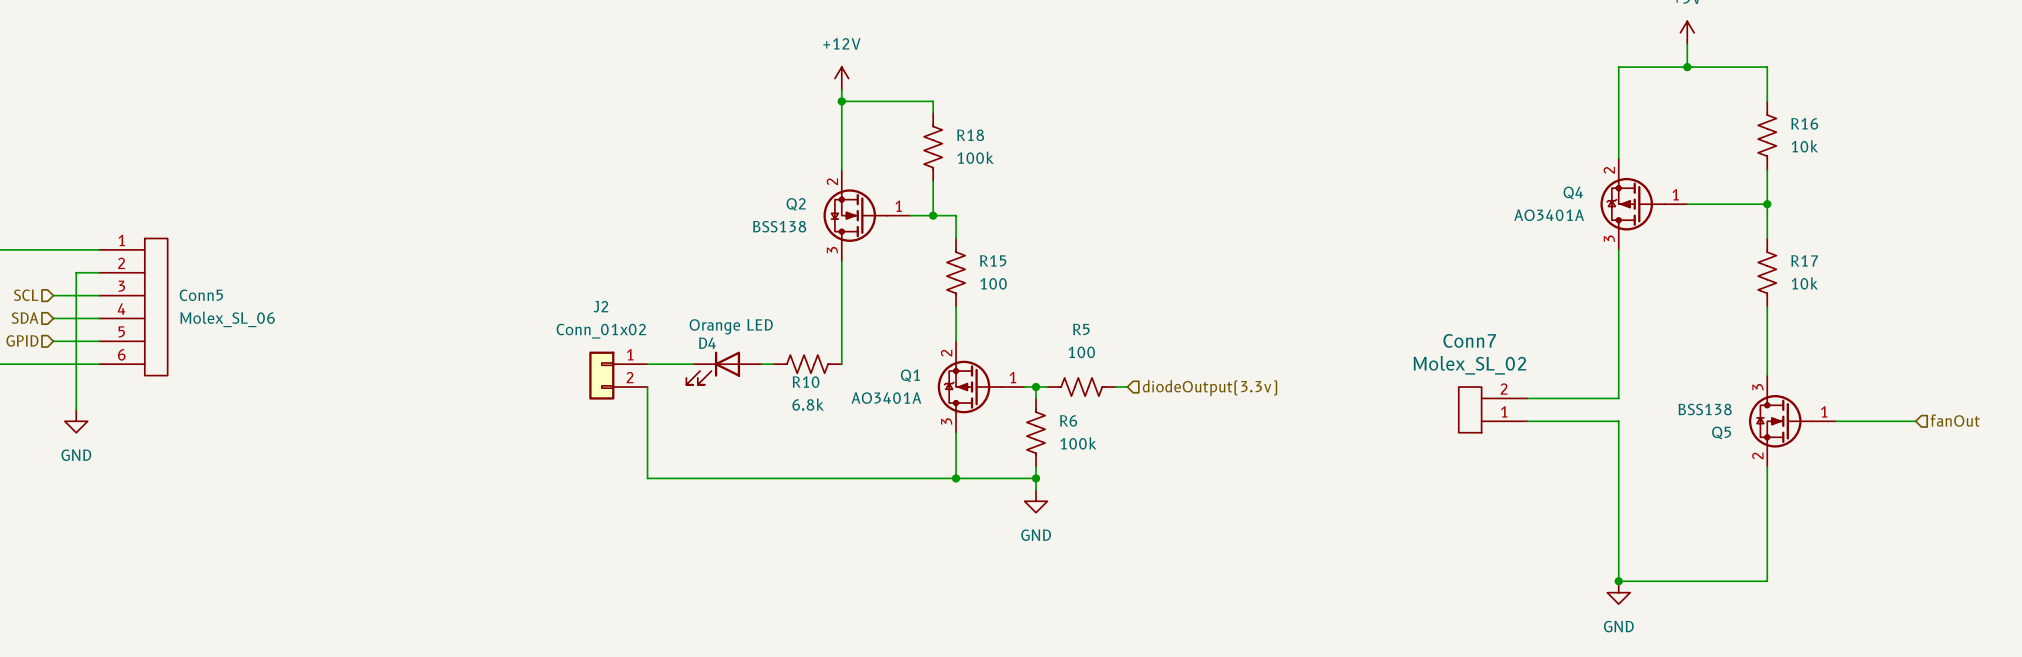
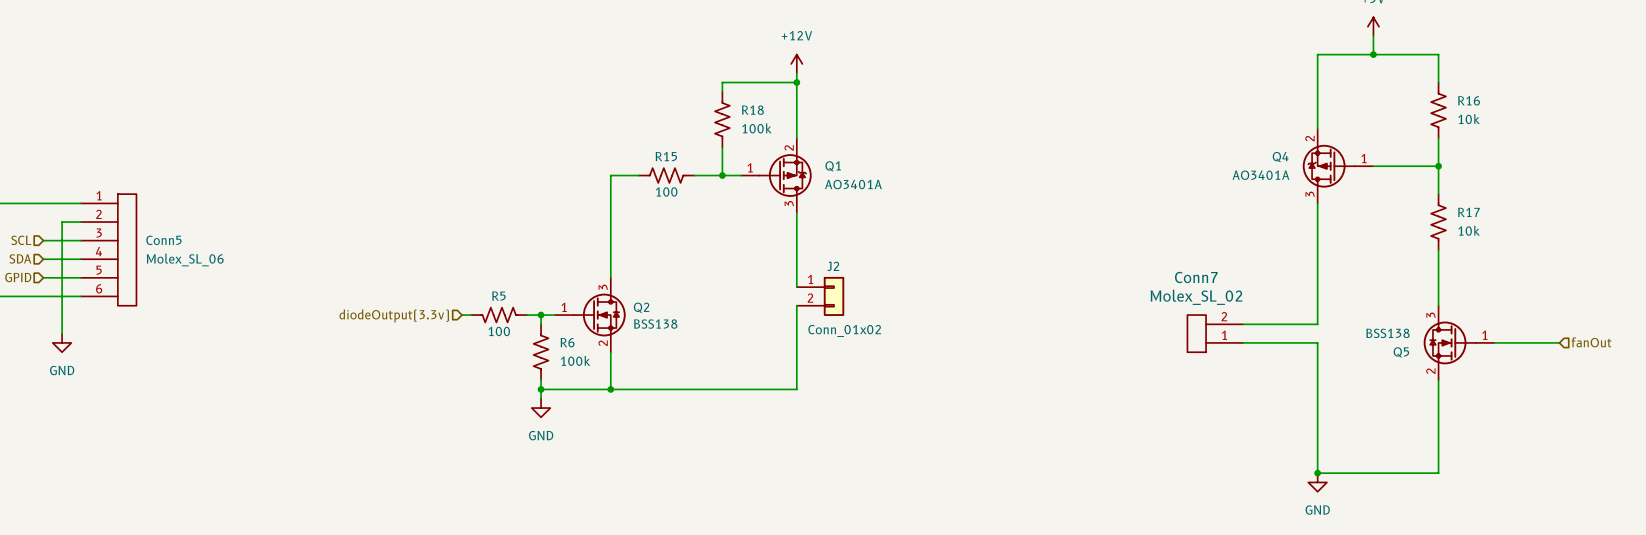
power symbol position: +12V (841, 78) -> +12V (796, 63)
wire: (841, 89) (841, 169) -> (796, 73) (796, 138)
wire: (841, 101) (887, 101) -> (722, 91) (722, 82)
junction: (841, 101) -> none
wire: (933, 101) (933, 112) -> (759, 82) (796, 82)
junction: none -> (796, 82)
R18 position: (933, 147) -> (722, 119)
wire: (933, 181) (933, 215) -> (722, 147) (722, 175)
Q2 name position: Q2 (796, 204) -> Q2 (641, 307)
wire: none -> (638, 175) (610, 175) (610, 277)
Q2 rotation: 0° (855, 215) -> 180° (599, 315)
Q2 position: (866, 215) -> (590, 315)
junction position: (933, 215) -> (722, 175)
Q2 value position: BSS138 (779, 226) -> BSS138 (655, 324)
R15 name position: R15 (993, 260) -> R15 (666, 156)
wire: (841, 261) (841, 364) -> none
wire: none -> (796, 212) (796, 287)
R15 rotation: 0° (956, 272) -> 90° clockwise (666, 175)
R15 position: (956, 272) -> (666, 175)
R15 value position: 100 (993, 283) -> 100 (666, 191)
J2 name position: J2 (600, 306) -> J2 (833, 266)
wire: (956, 307) (956, 341) -> none
R5 name position: R5 (1081, 329) -> R5 (498, 296)
J2 value position: Conn_01x02 (601, 331) -> Conn_01x02 (844, 330)
R5 value position: 100 (1081, 352) -> 100 (499, 331)
wire: (647, 364) (693, 364) -> none
wire: (761, 364) (773, 364) -> (461, 315) (471, 315)
R10: 6.8k (807, 364) -> none
D4: Orange LED (724, 368) -> none
J2 flip: as is (601, 375) -> left-right (834, 296)
J2 position: (618, 375) -> (820, 296)
wire: (647, 387) (647, 478) (664, 478) -> (527, 315) (554, 315)
wire: none -> (541, 315) (541, 324)
junction: none -> (541, 315)
Q1 flip: as is (969, 387) -> left-right (785, 175)
Q1 position: (981, 387) -> (776, 175)
wire: (1036, 387) (1036, 398) -> none
junction: (1036, 387) -> none
R5 flip: as is (1081, 387) -> left-right (499, 315)
R5 position: (1081, 387) -> (499, 315)
wire: (1115, 387) (1127, 387) -> none
hierarchical label: none -> diodeOutput(3.3v) (394, 315)
hierarchical label: diodeOutput(3.3v) (1210, 388) -> none
wire: (956, 432) (956, 478) -> (610, 352) (610, 389)
R6 position: (1036, 432) -> (541, 352)
wire: none -> (541, 380) (541, 398)
wire: (1036, 467) (1036, 489) -> none
junction: none -> (541, 389)
junction: none -> (610, 389)
junction: (956, 478) -> none
wire: (978, 478) (1036, 478) -> (796, 389) (796, 305)
junction: (1036, 478) -> none
power symbol: none -> GND (541, 408)
power symbol: GND (1036, 501) -> none

